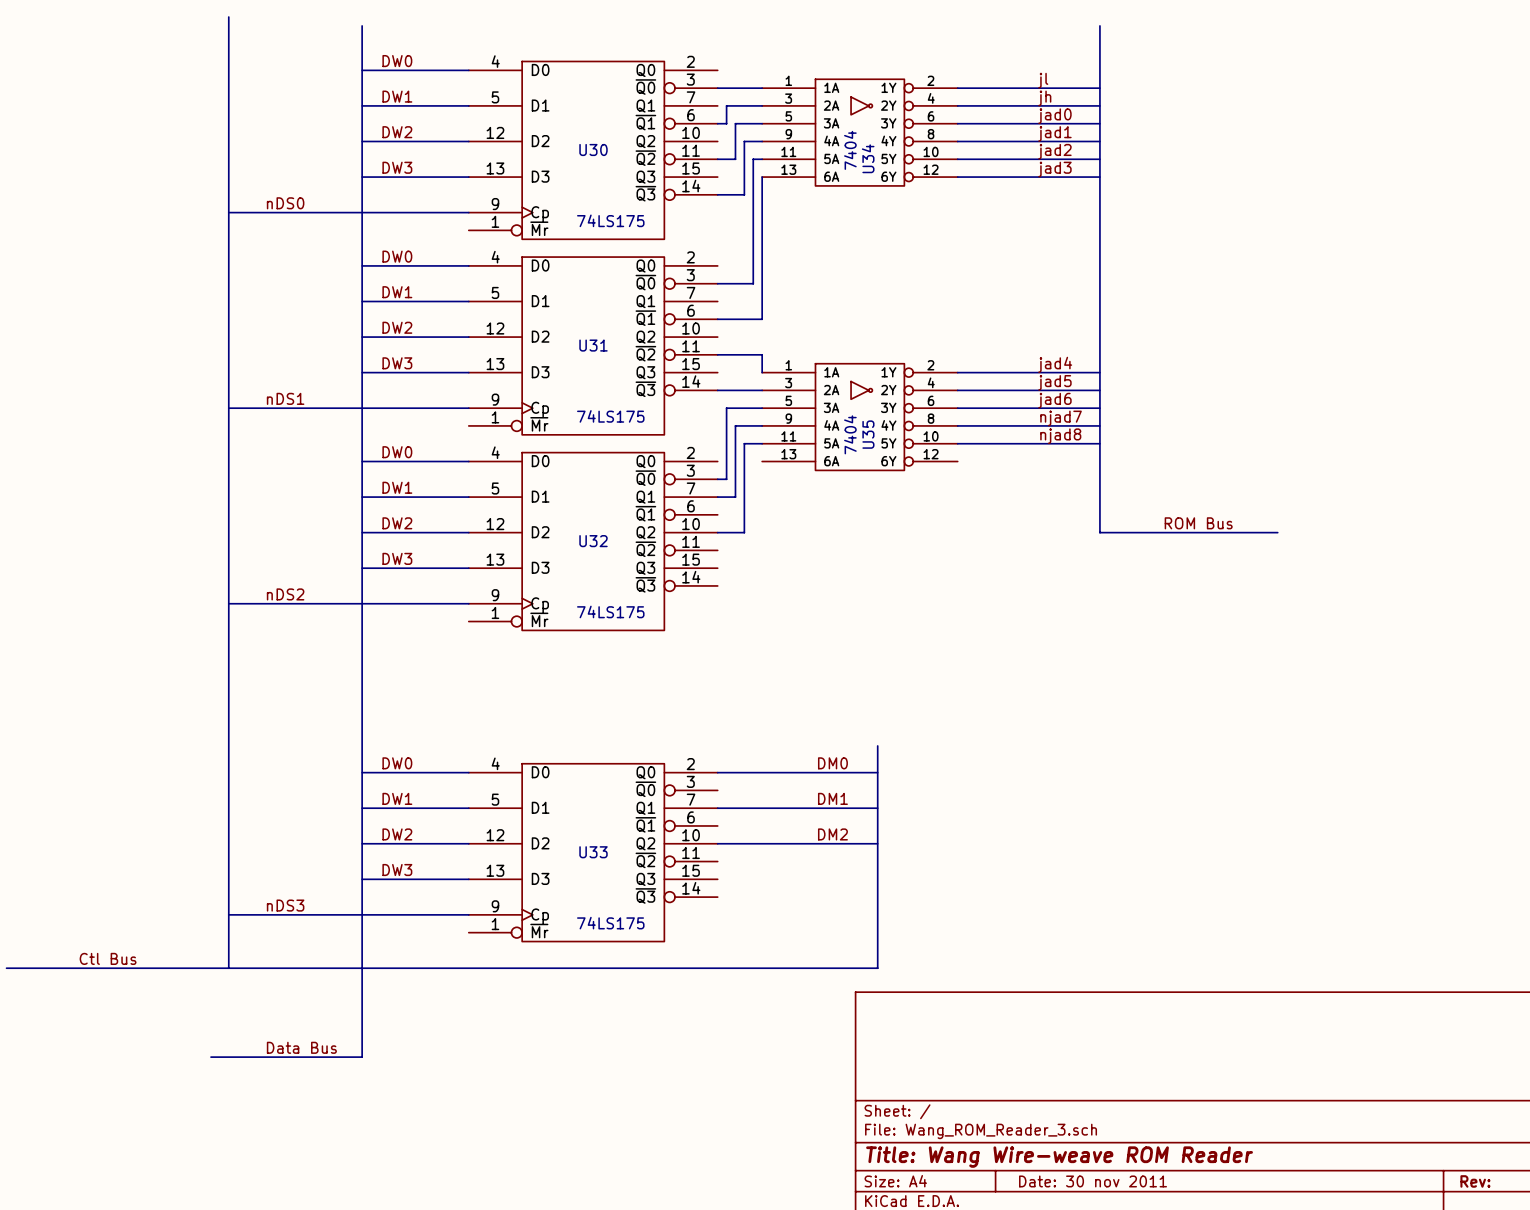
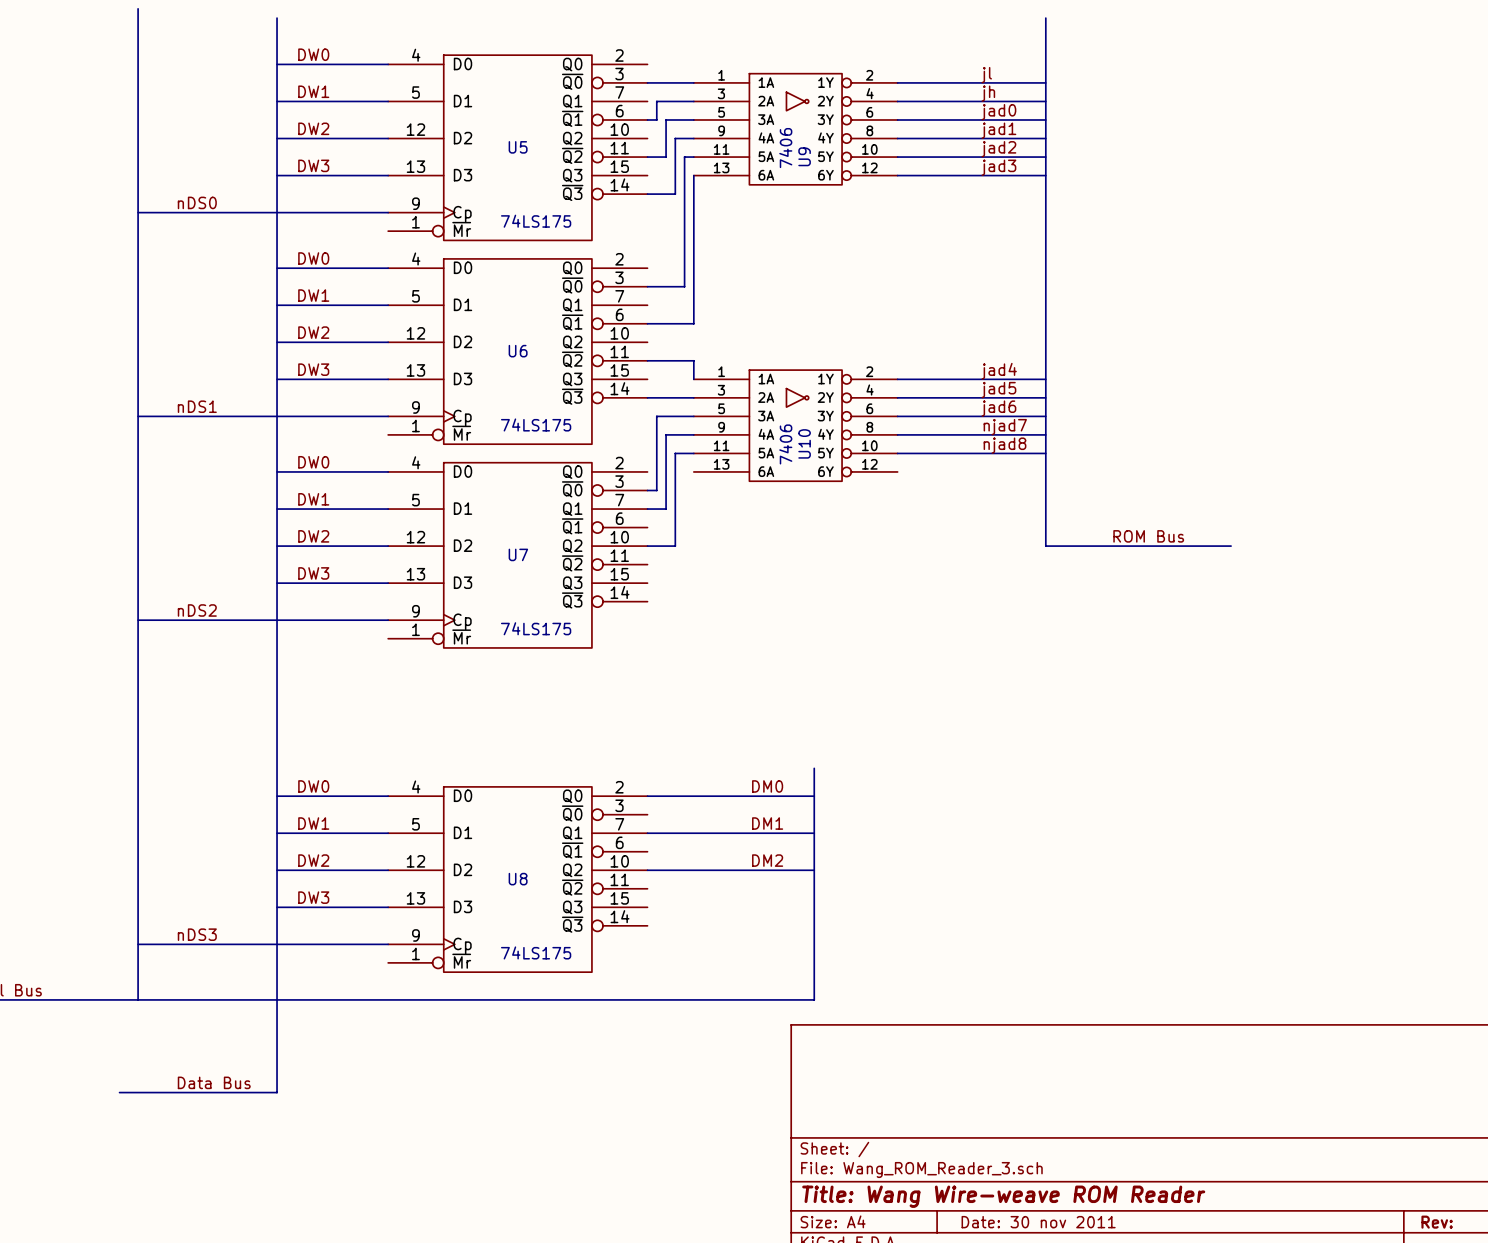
U30 name: U30 (593, 149) -> U5 (518, 147)
U34 value: 7404 (850, 150) -> 7406 (785, 148)
U34 name: U34 (868, 158) -> U9 (804, 156)
U31 name: U31 (593, 345) -> U6 (518, 351)
U35 value: 7404 (850, 434) -> 7406 (785, 444)
U35 name: U35 (868, 434) -> U10 (804, 443)
U32 name: U32 (593, 541) -> U7 (518, 554)
U33 name: U33 (593, 852) -> U8 (518, 879)

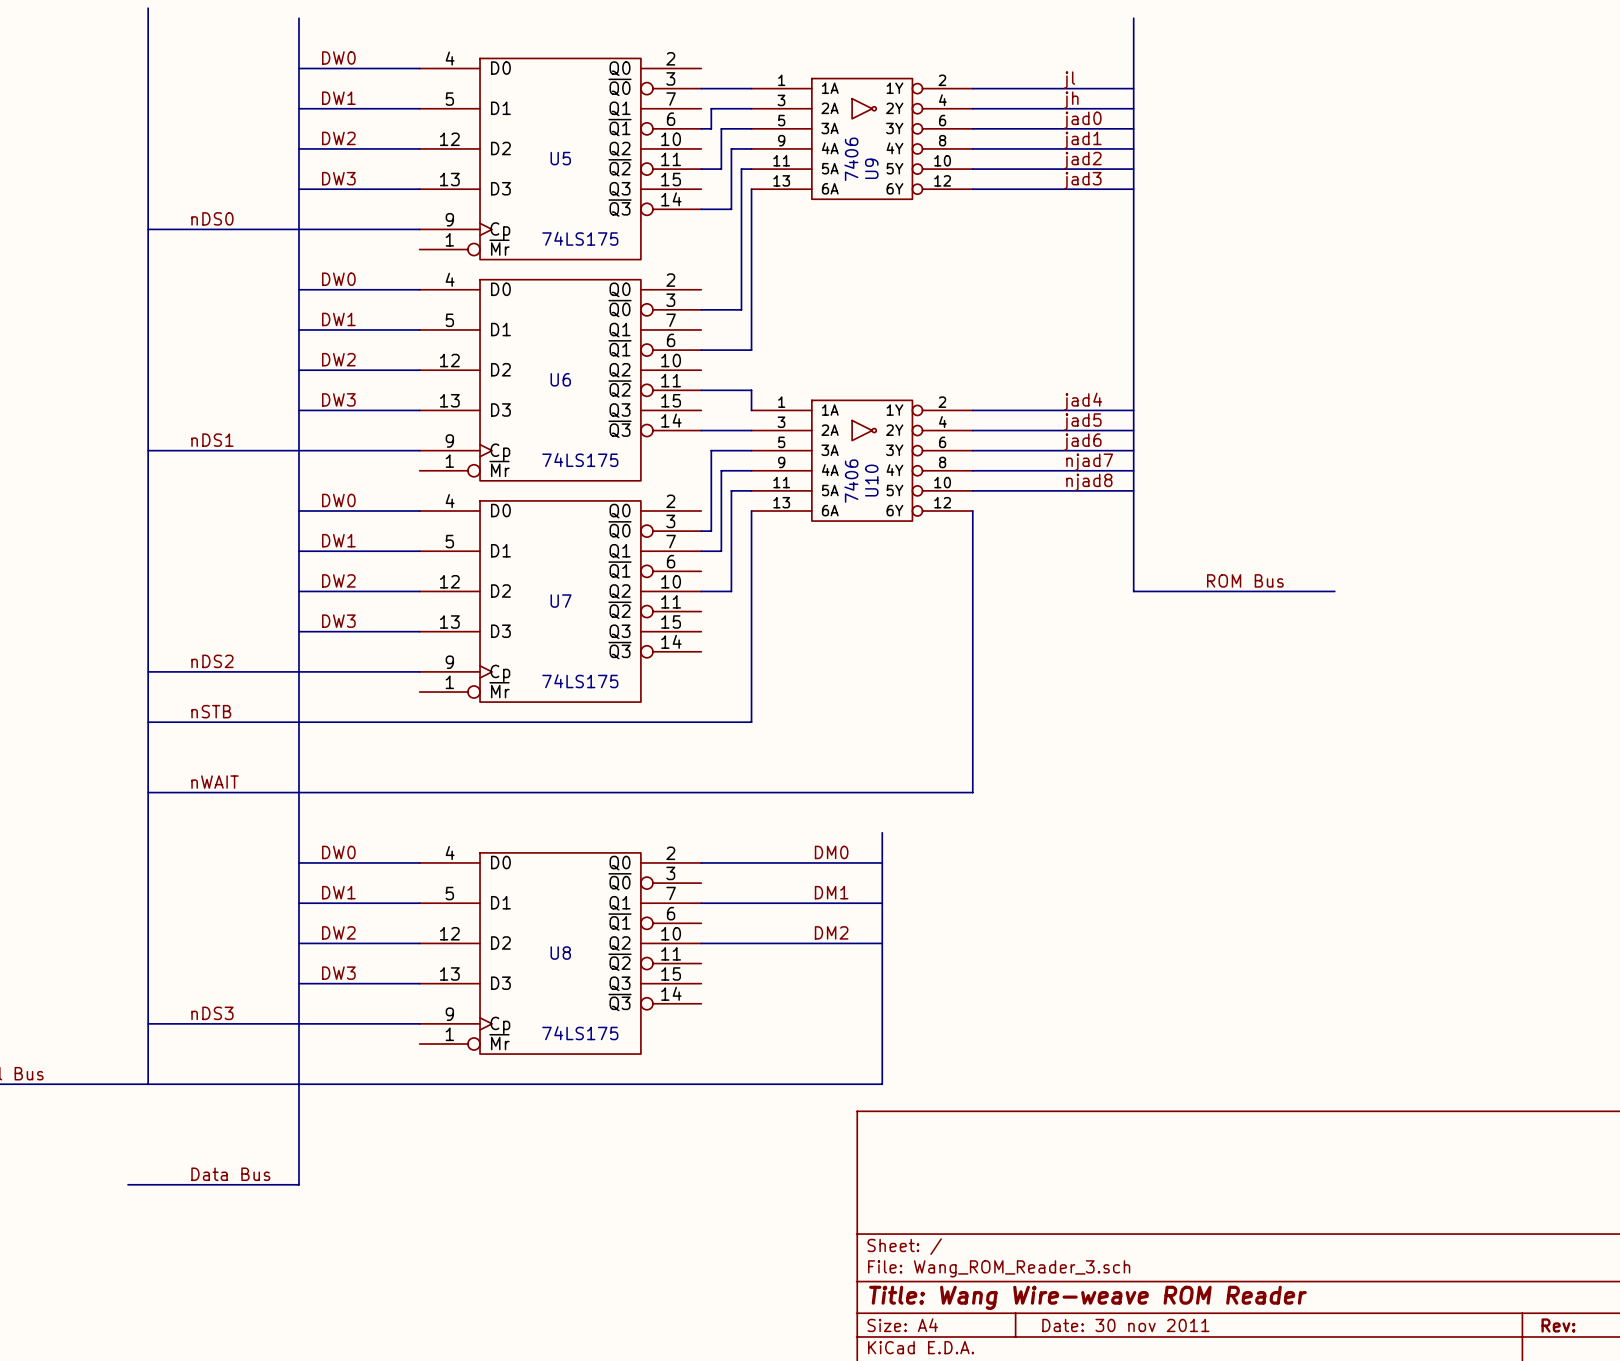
wire: none -> (751, 511) (751, 722) (148, 722)
wire: none -> (972, 511) (972, 792) (148, 792)
label: none -> nSTB (211, 711)
label: none -> nWAIT (215, 782)

